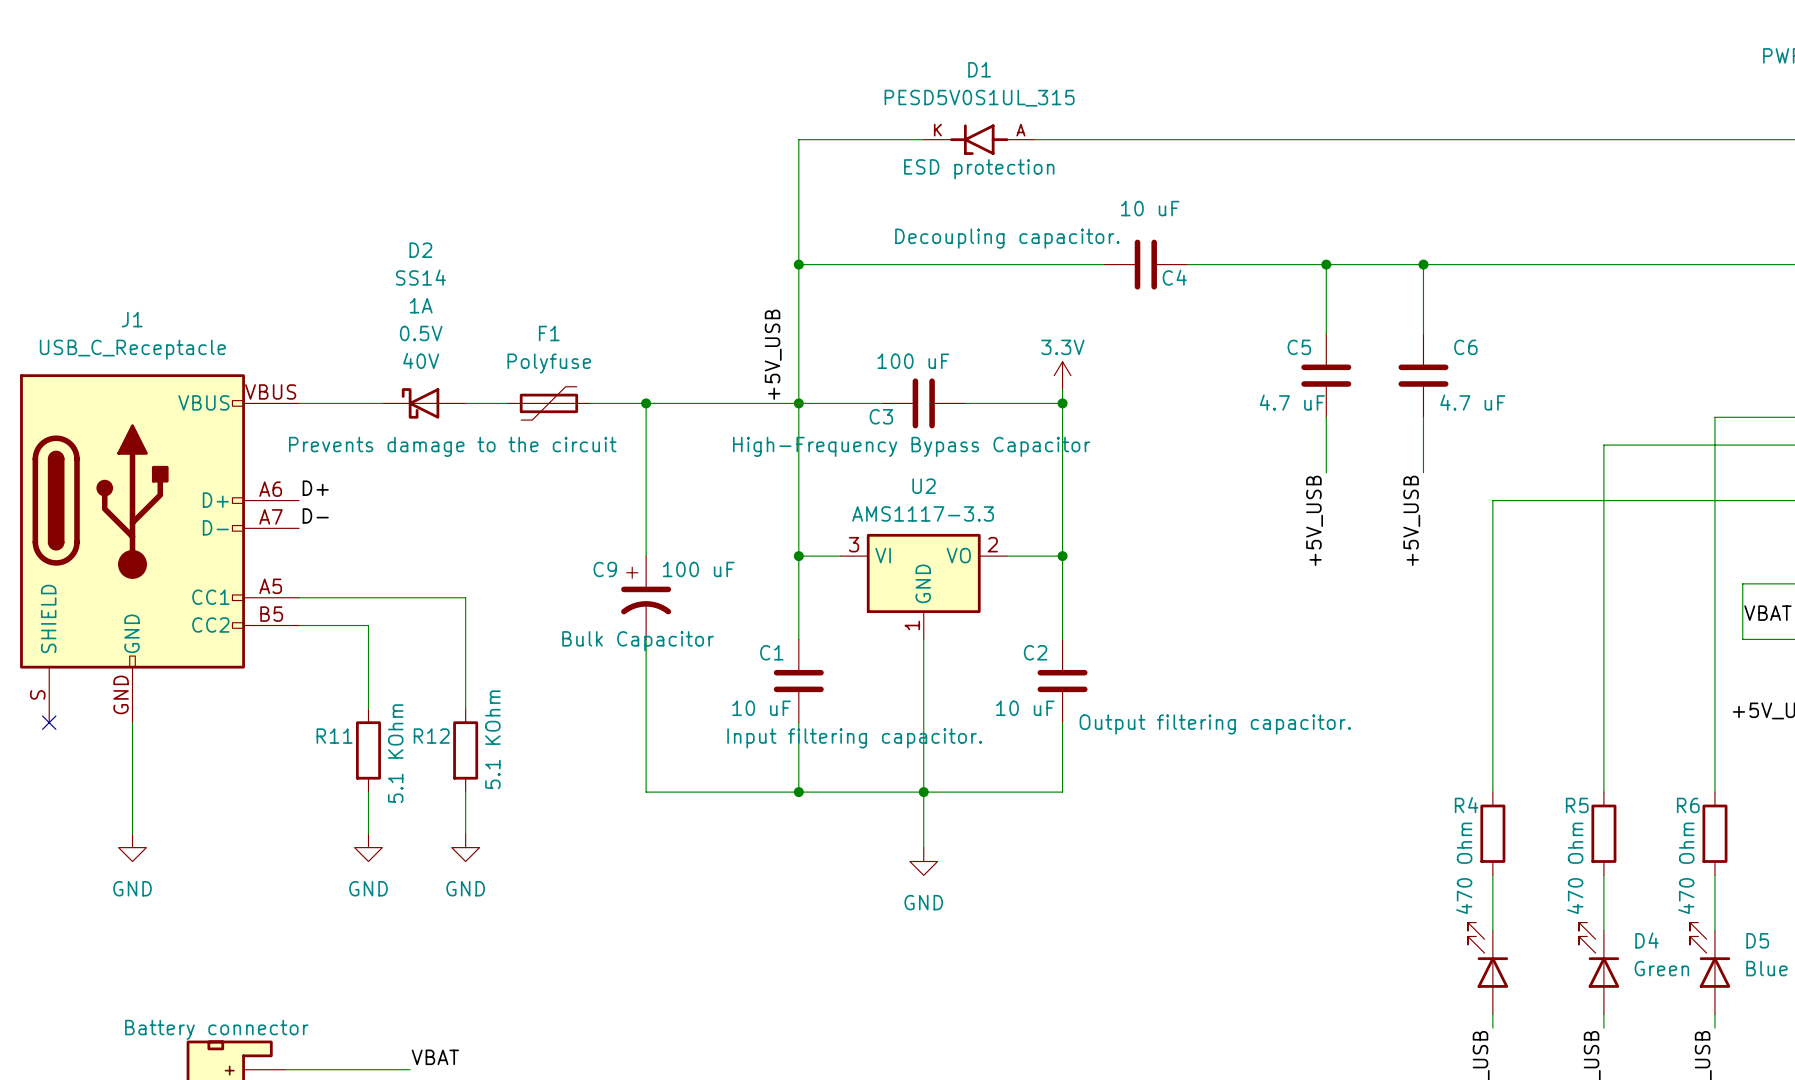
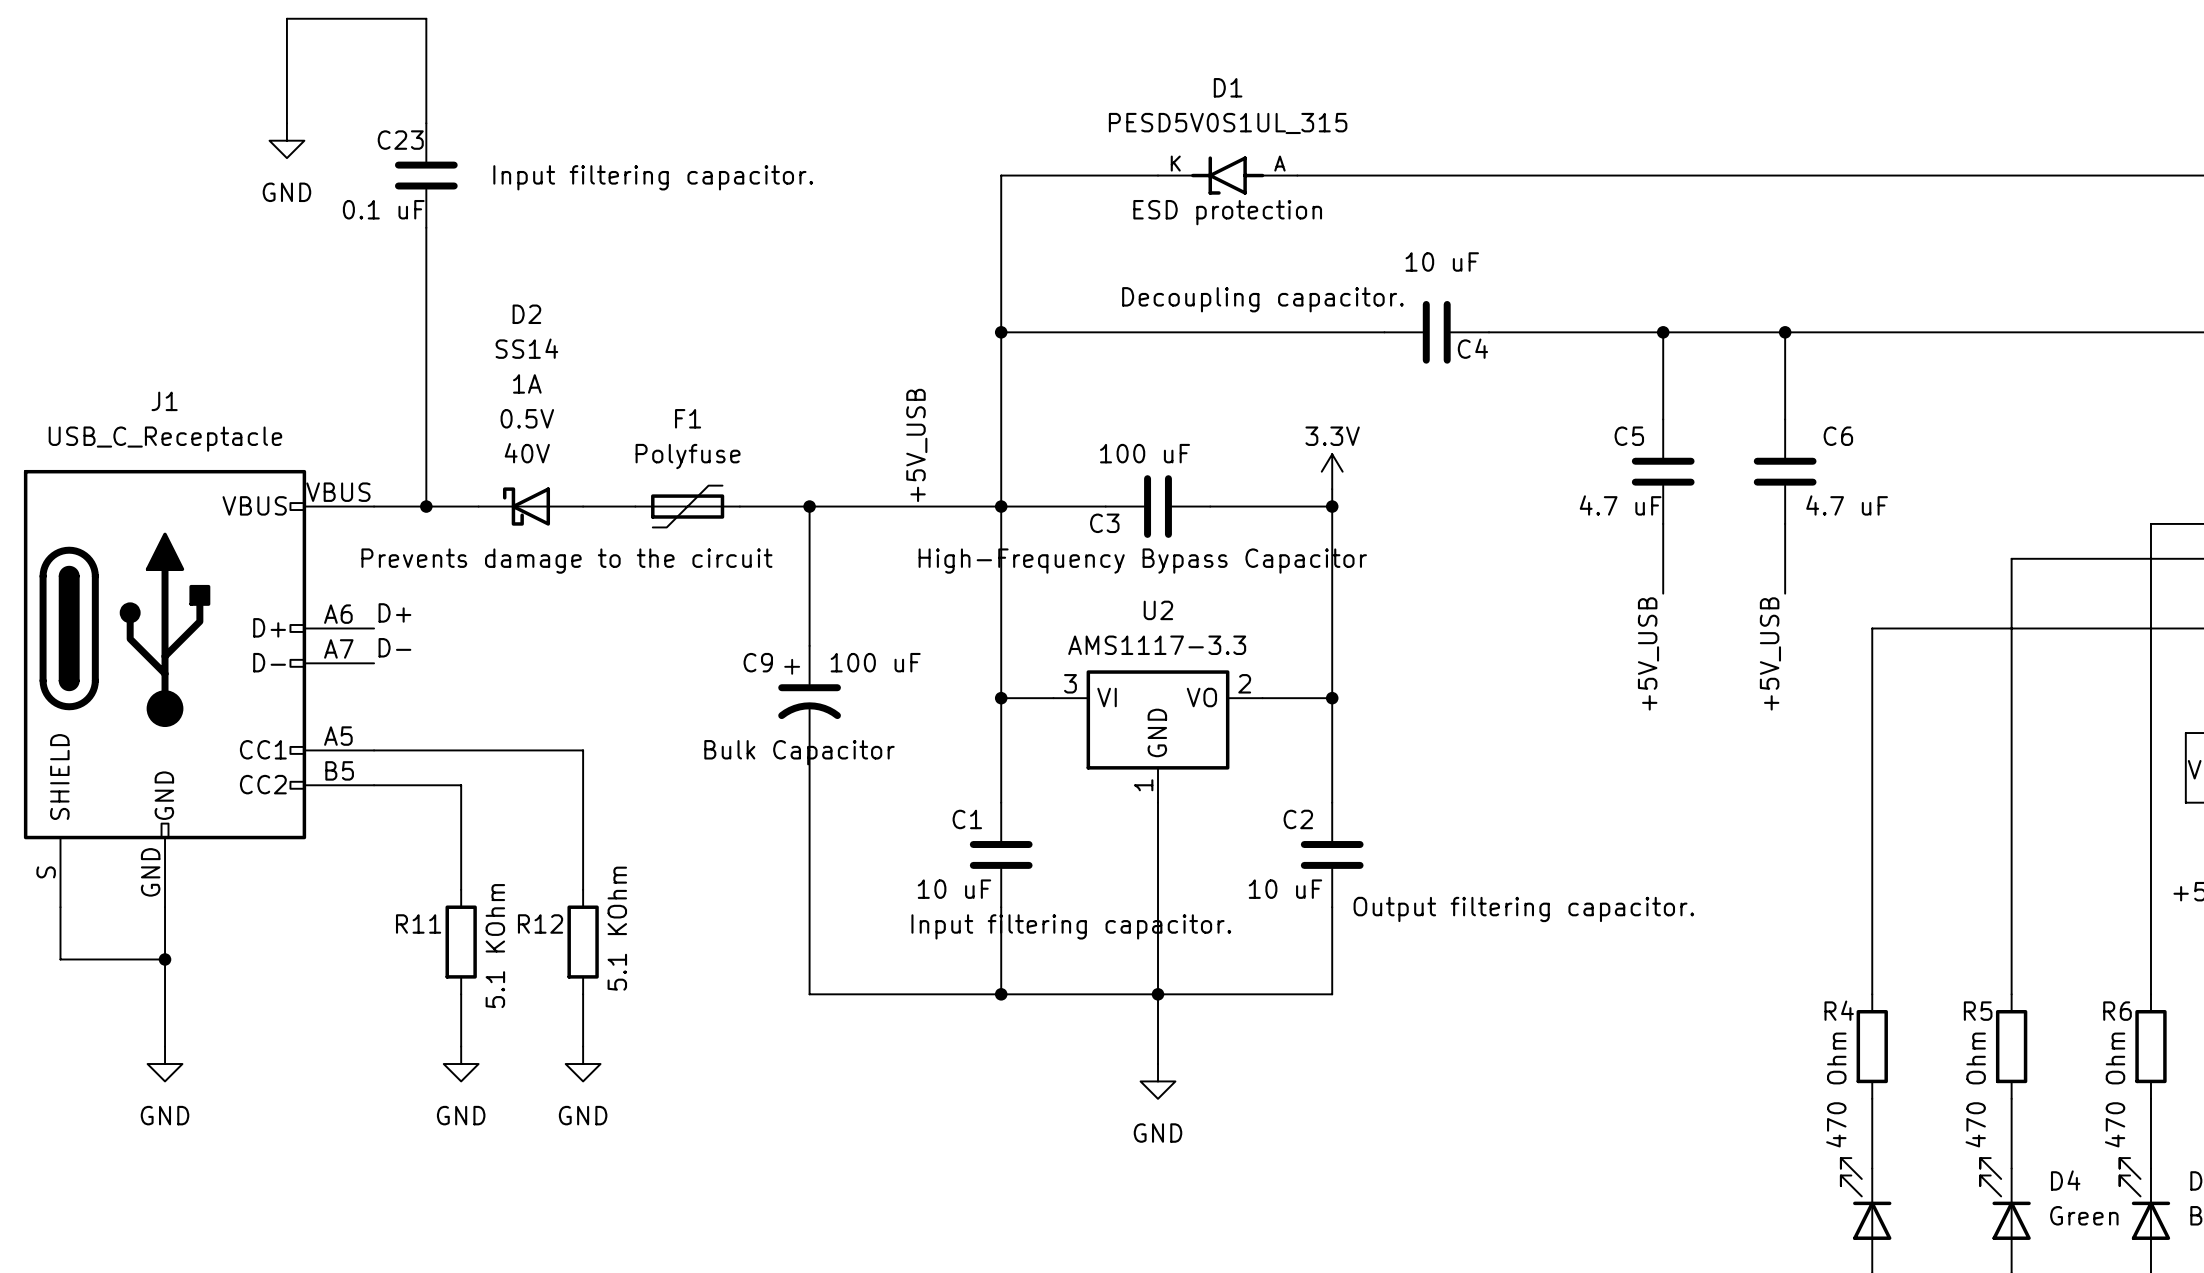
wire: none -> (286, 123) (286, 18) (426, 18) (426, 123)
power symbol: none -> GND (286, 140)
C23: none -> 0.1 uF (426, 175)
wire: none -> (426, 227) (426, 506)
label position: +5V_USB (773, 354) -> +5V_USB (916, 445)
junction: none -> (426, 506)
C9 position: (646, 597) -> (809, 698)
wire: none -> (60, 907) (60, 959) (165, 959)
no-connect mark: (49, 722) -> none
junction: none -> (165, 959)

